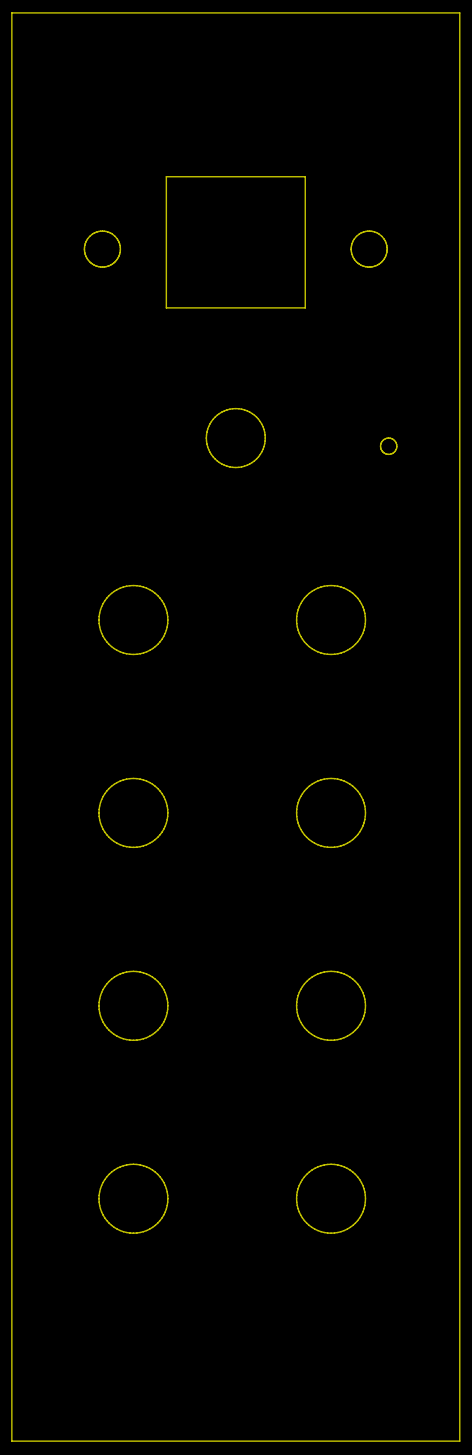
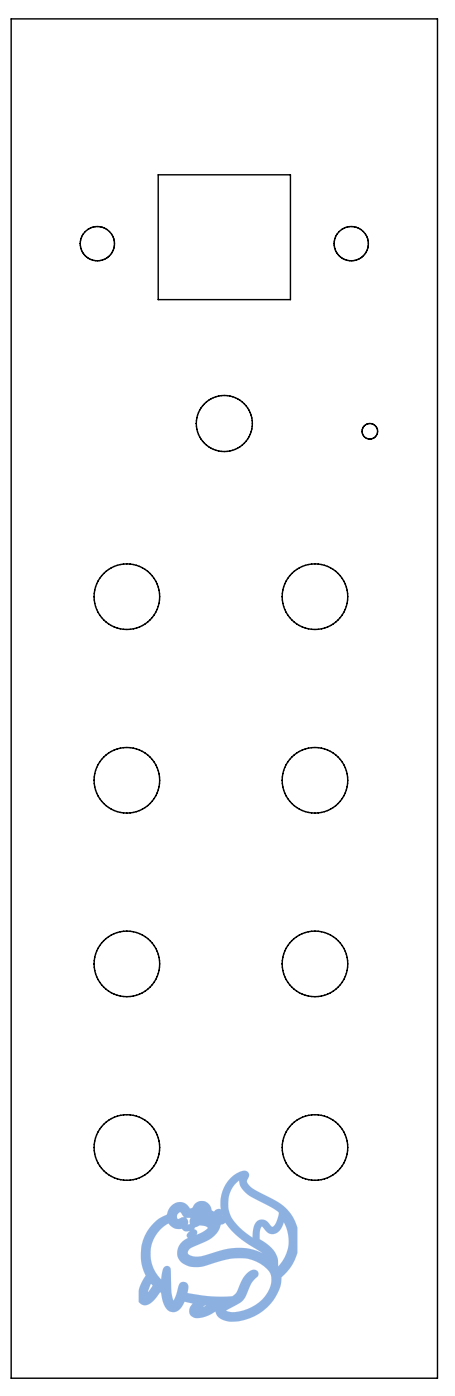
drawing: none -> [138, 1170, 298, 1322]

